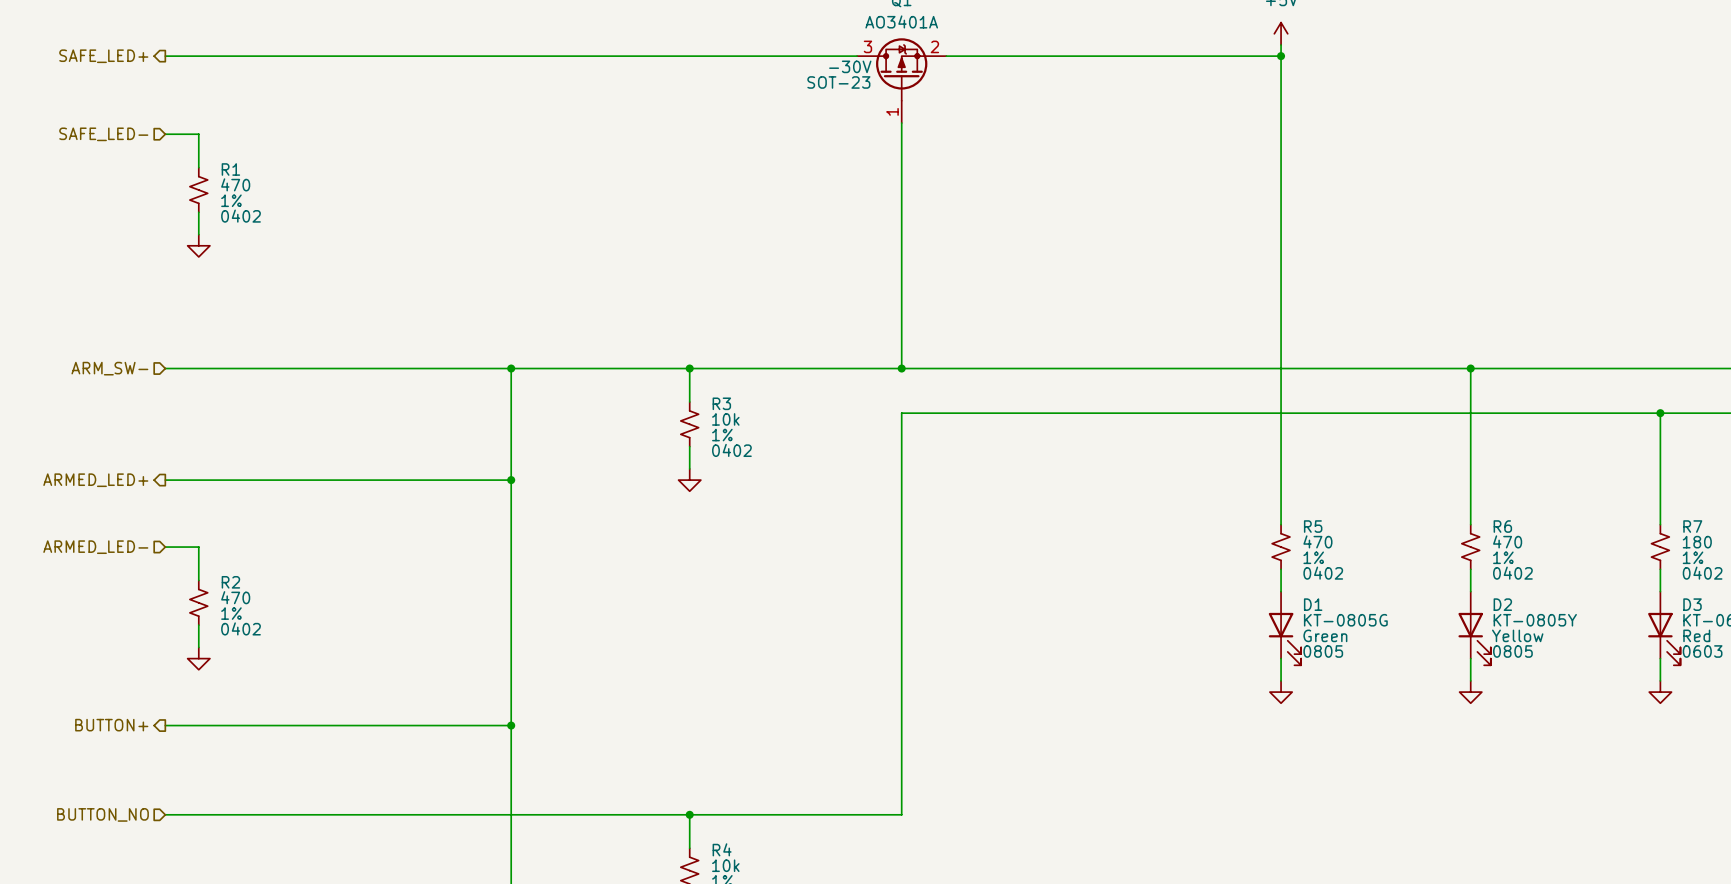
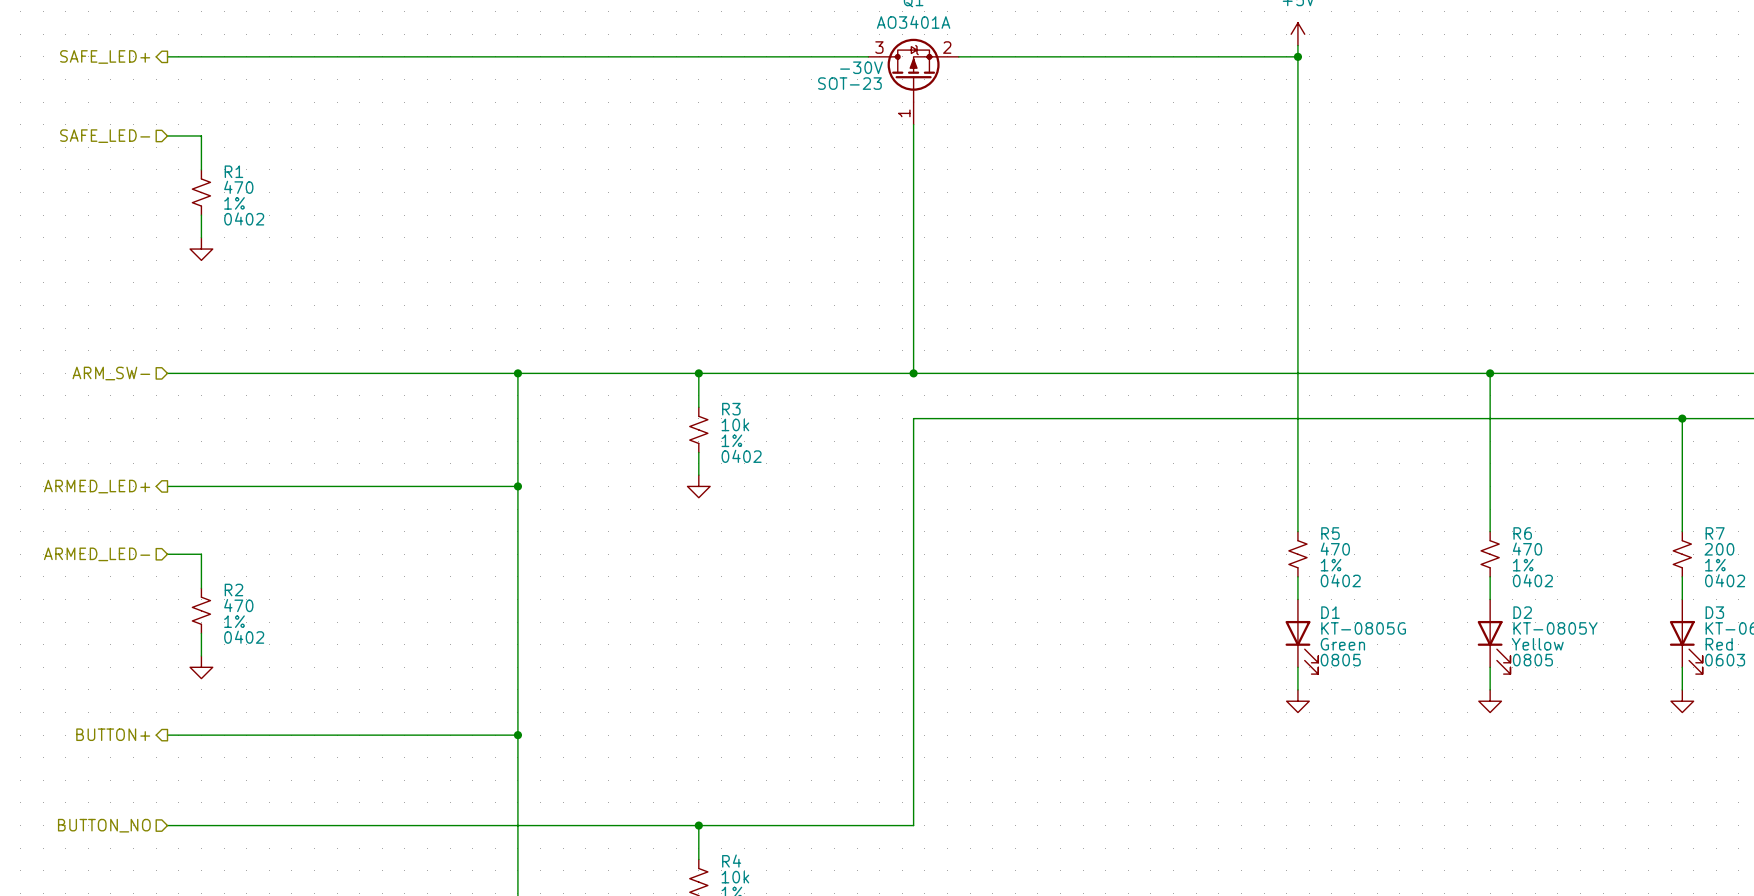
R7 value: 180 (1697, 542) -> 200 (1719, 549)

